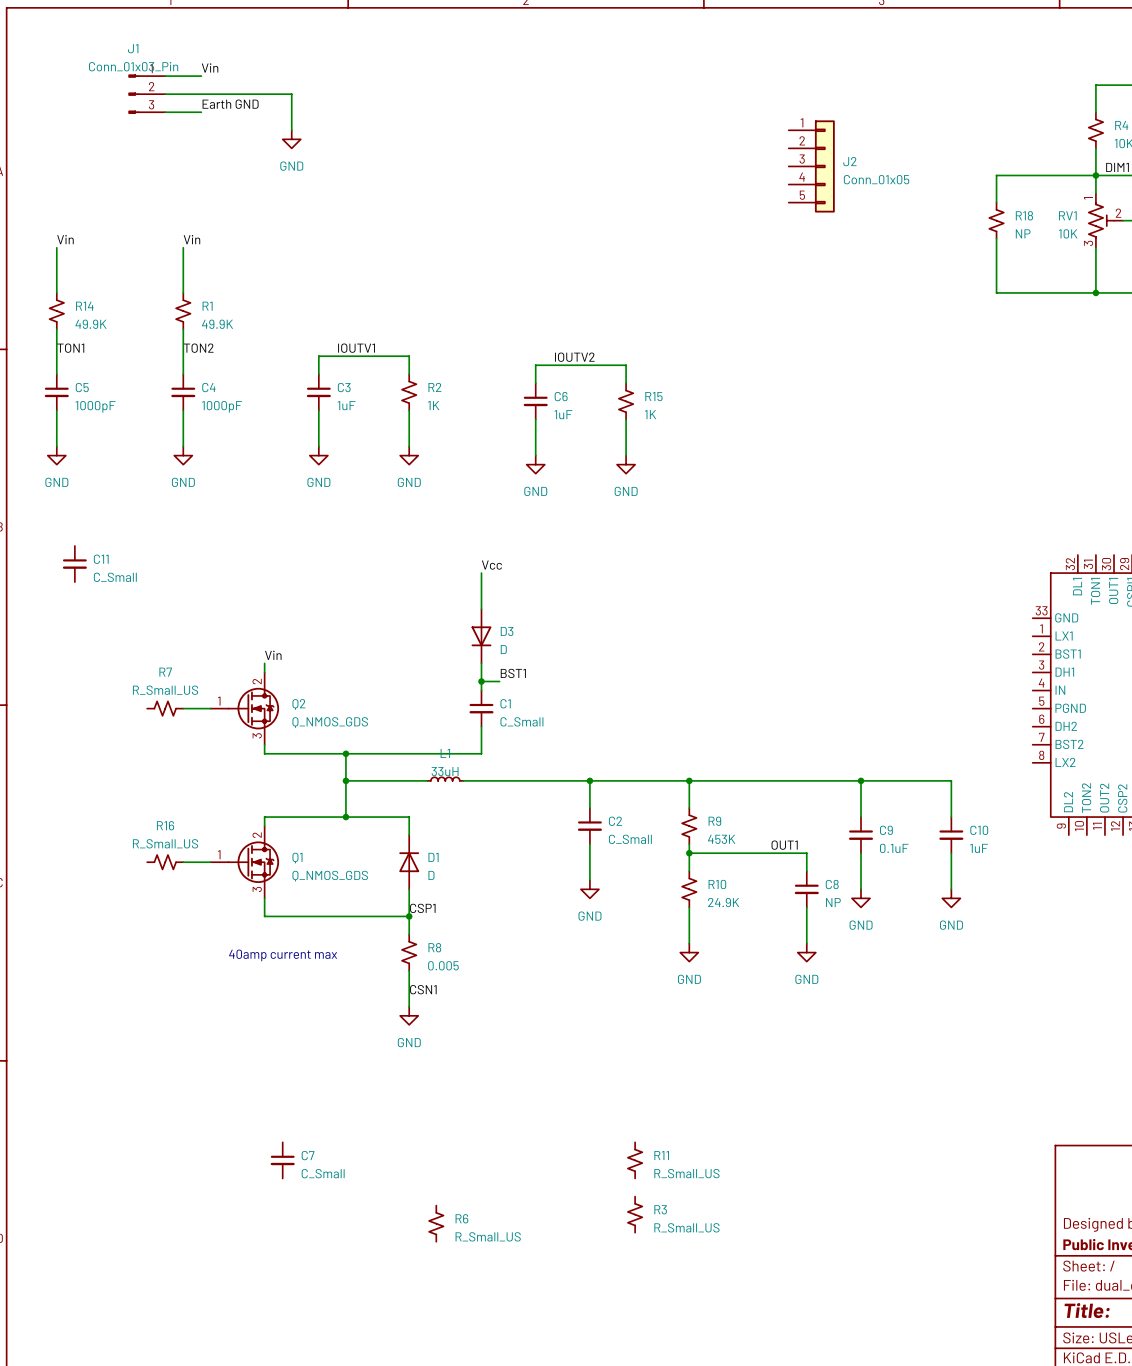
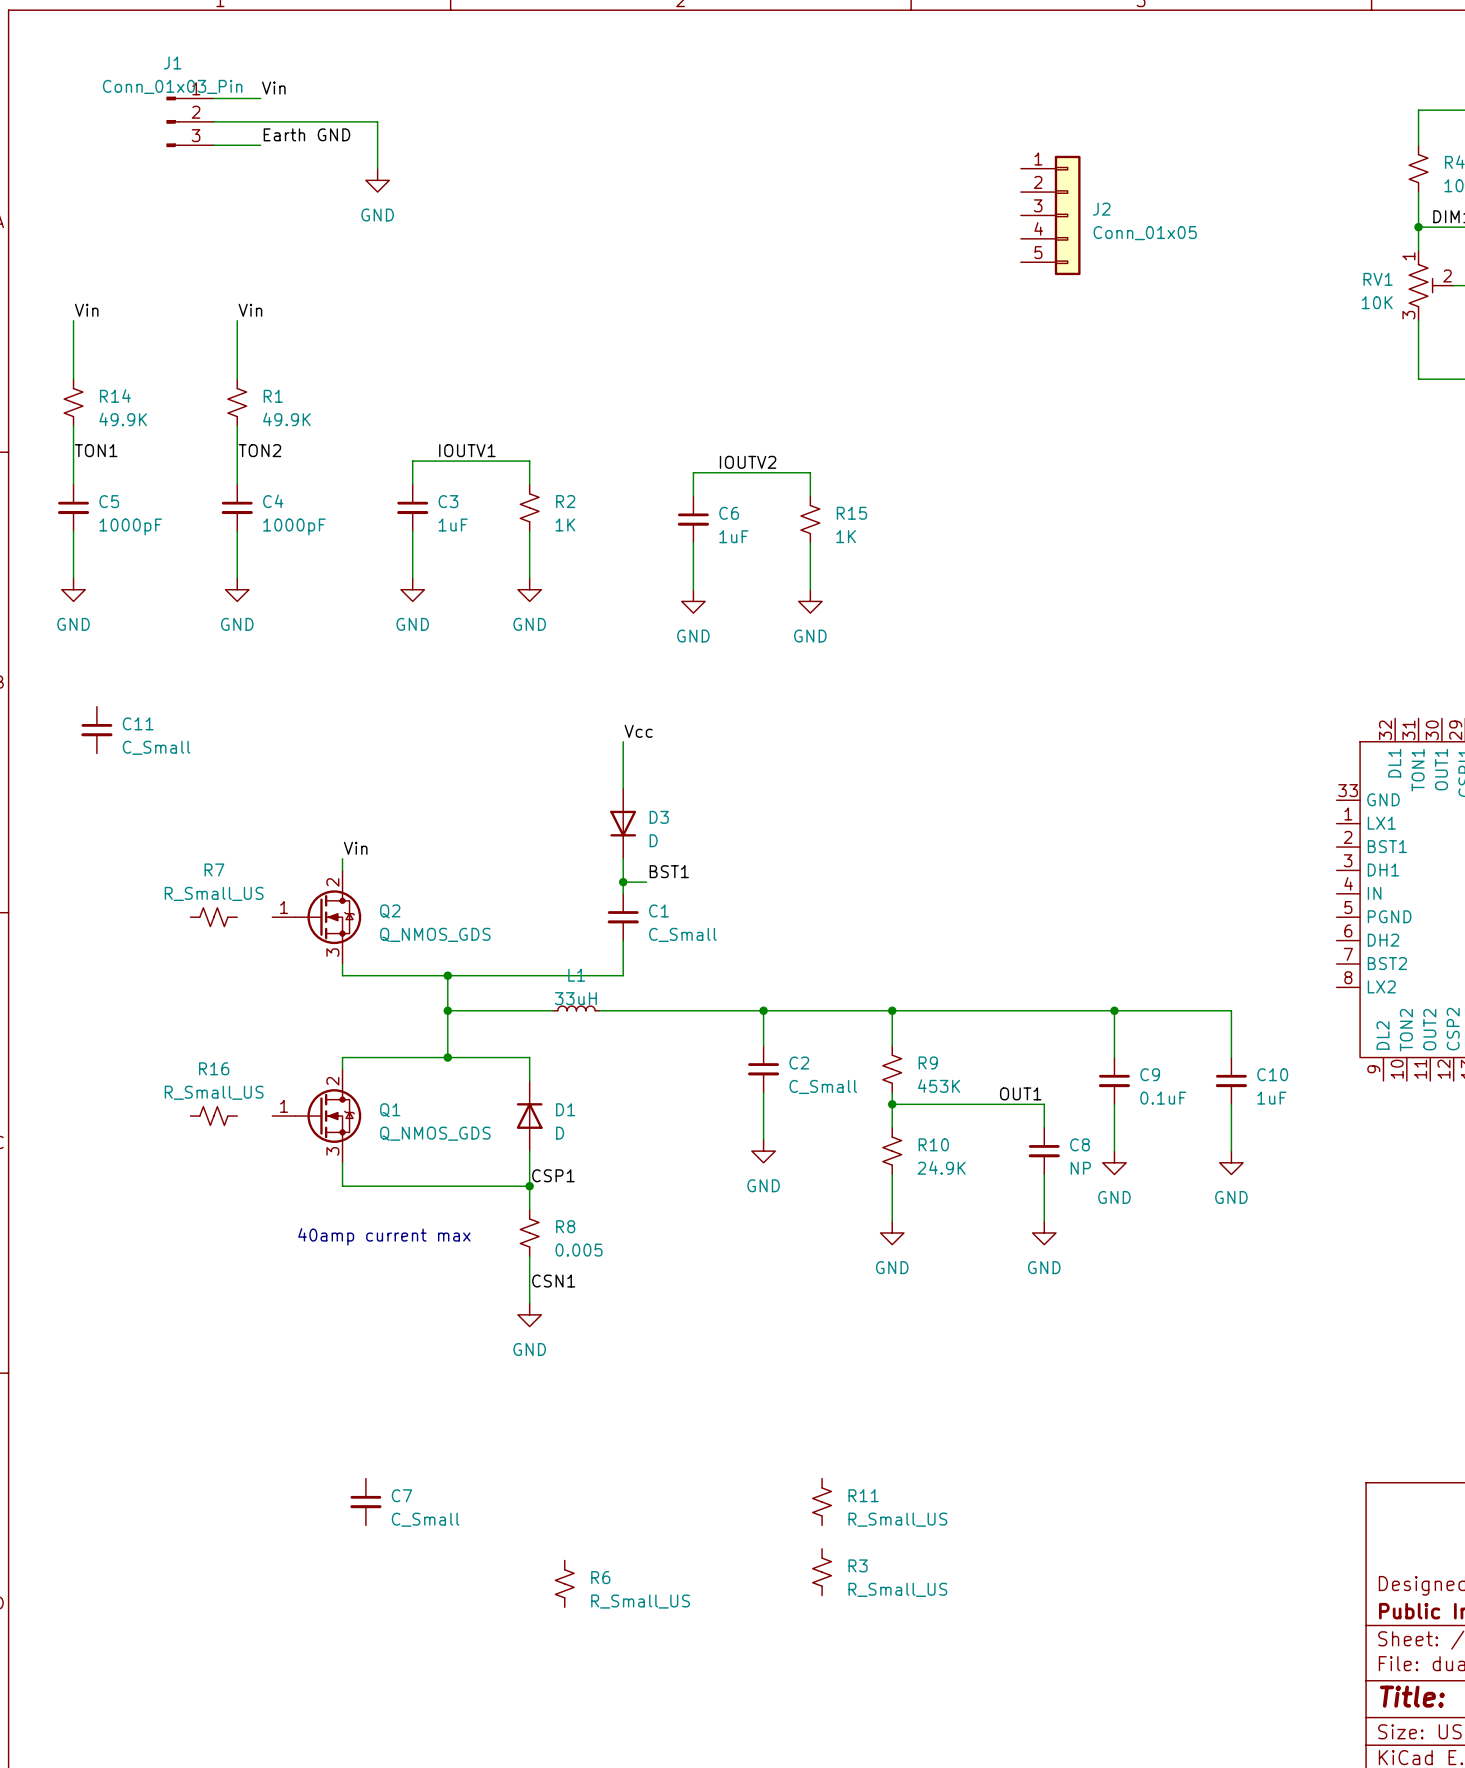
wire: (1095, 175) (996, 175) (996, 202) -> none
R18: NP (996, 220) -> none
wire: (996, 238) (996, 292) (1095, 292) -> none
junction: (1095, 292) -> none
wire: (183, 708) (210, 708) -> none
wire: (183, 862) (210, 862) -> none

